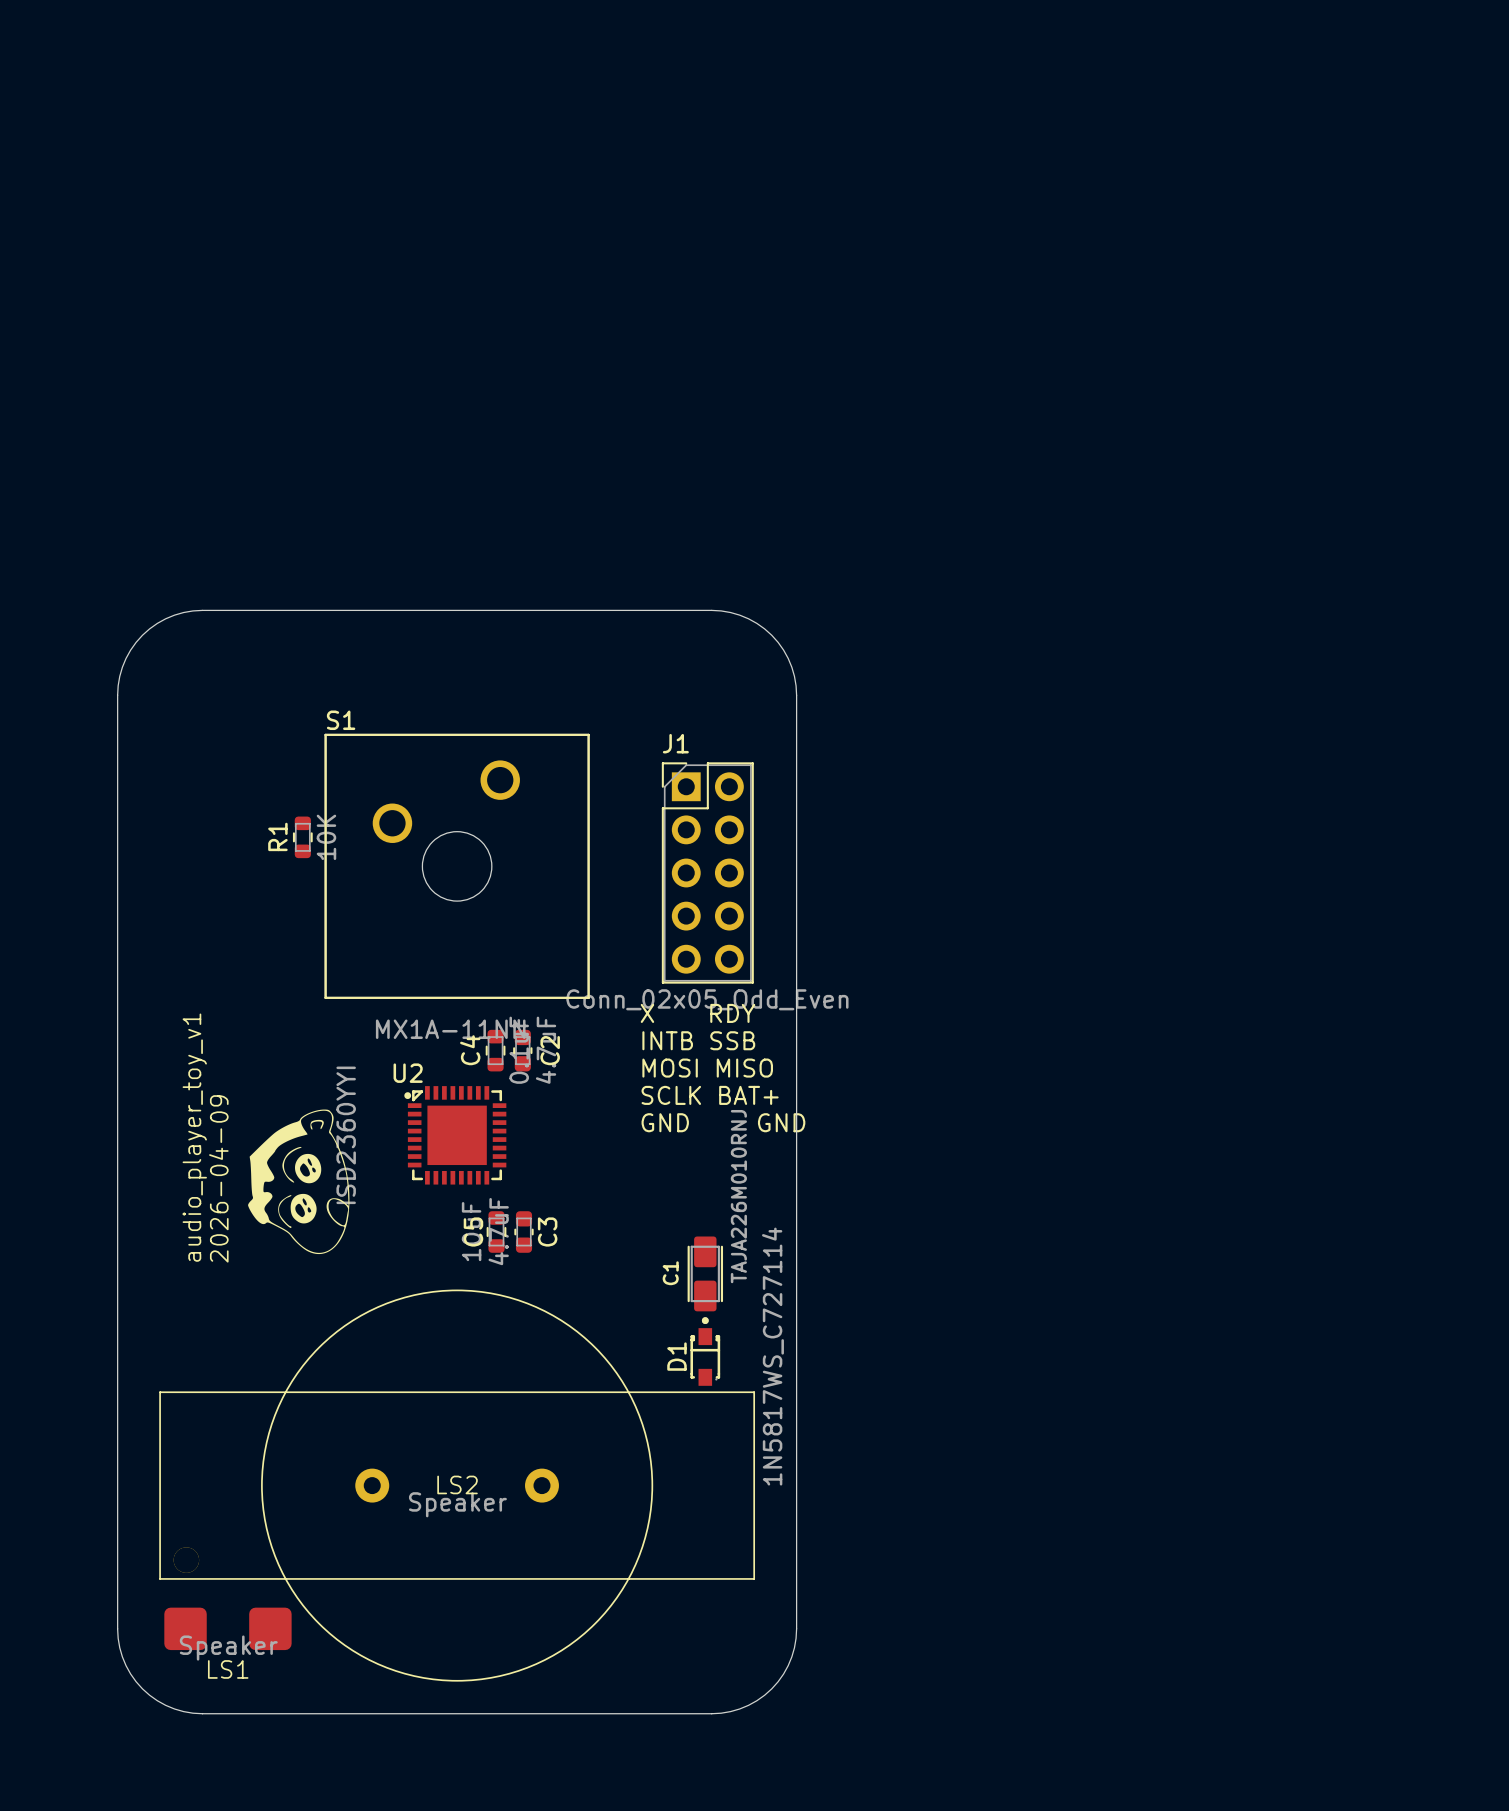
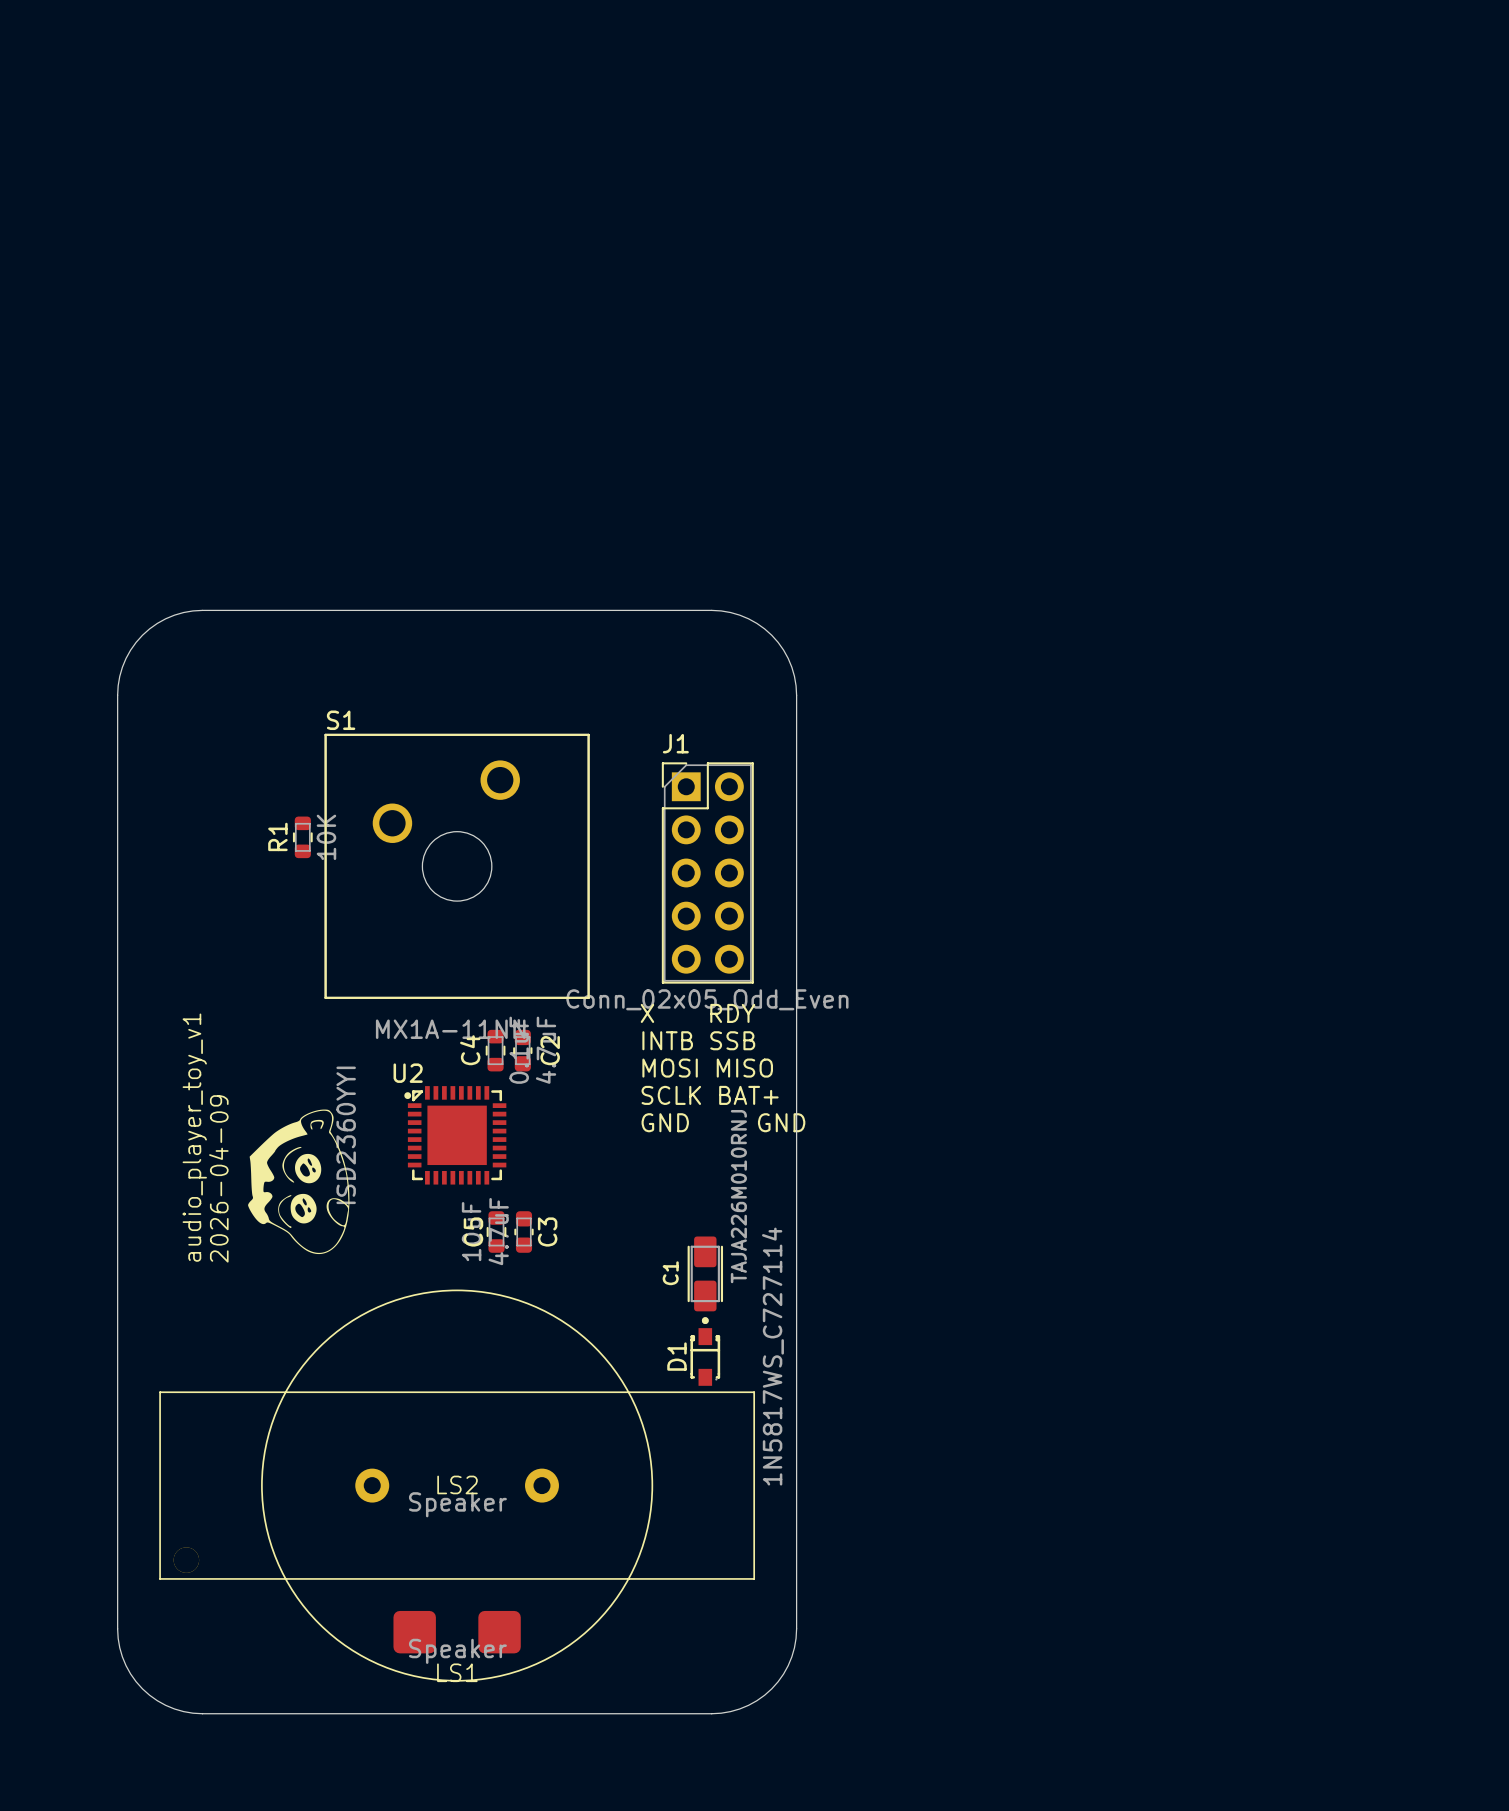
LS1 position: (227, 1628) -> (457, 1632)

